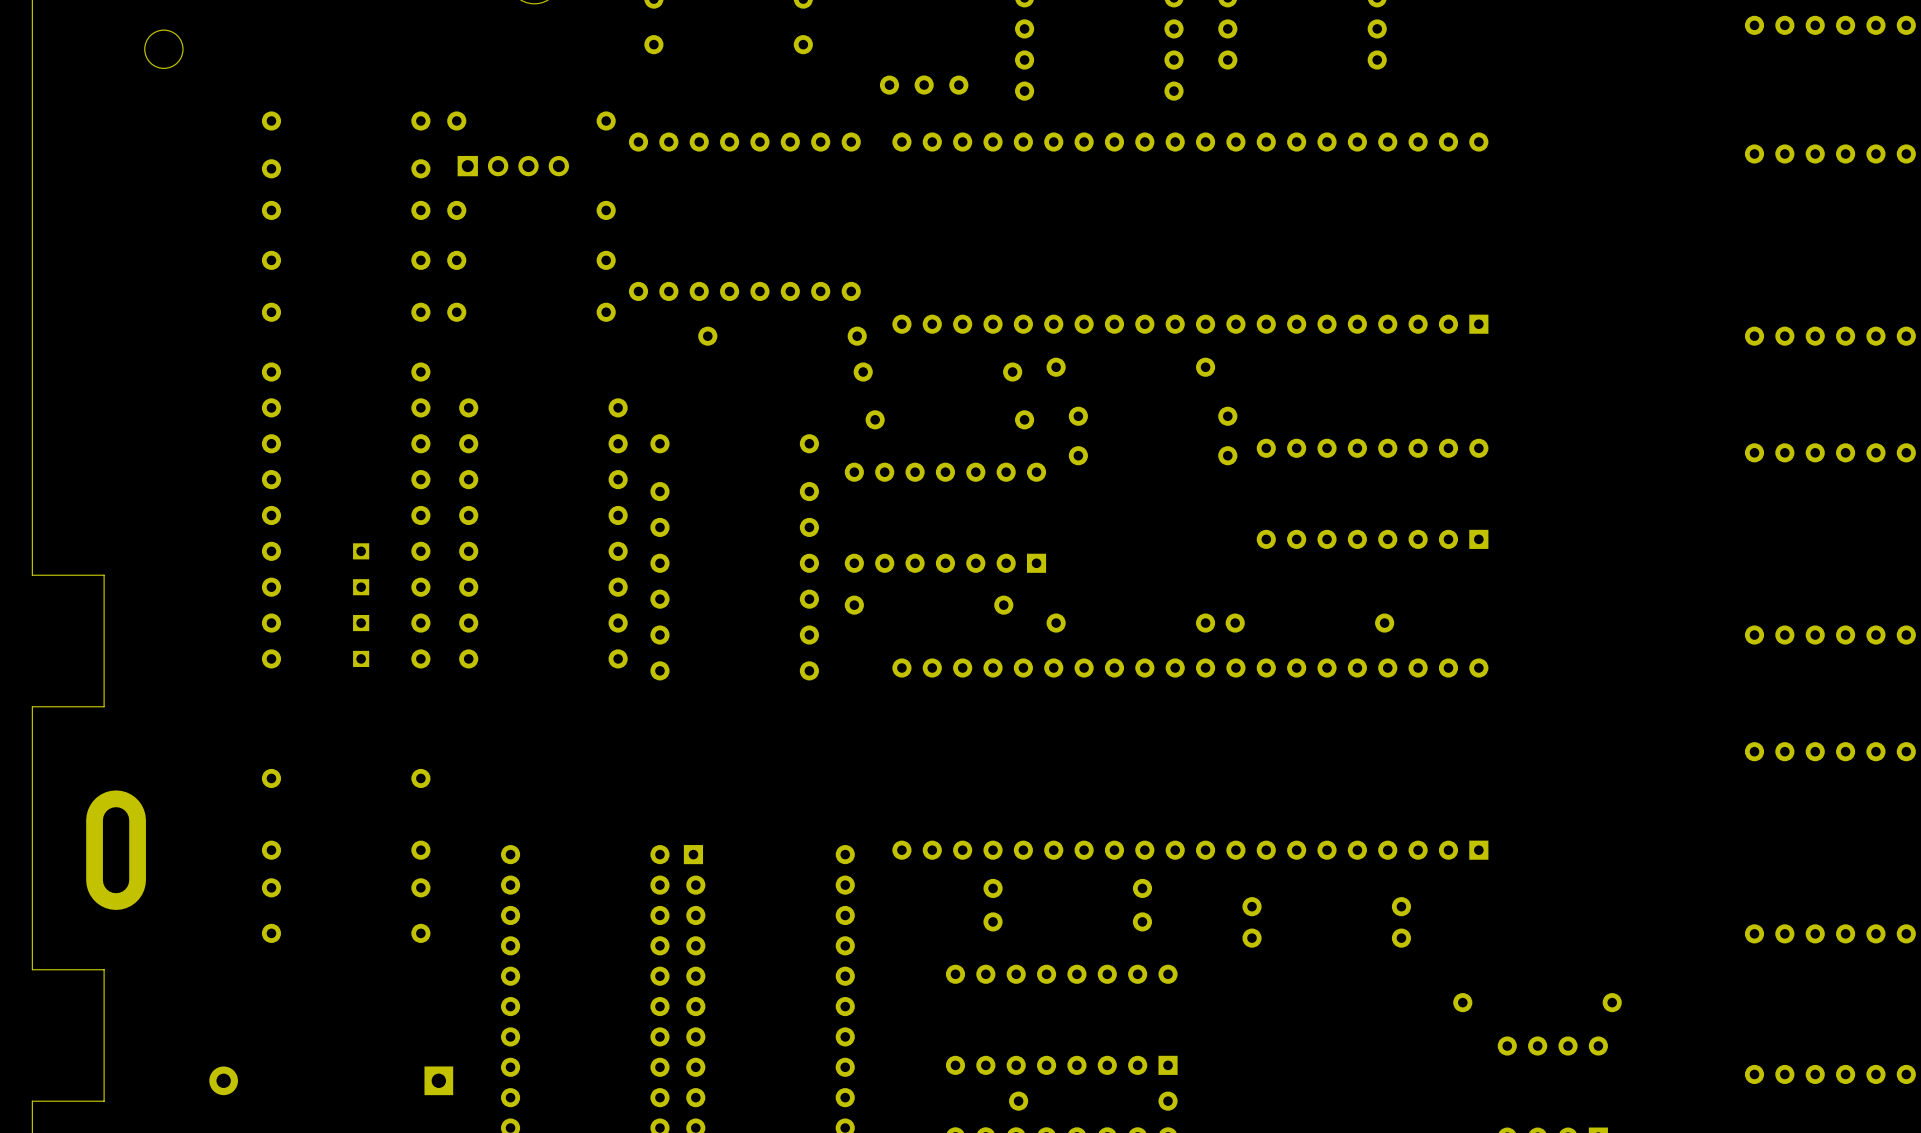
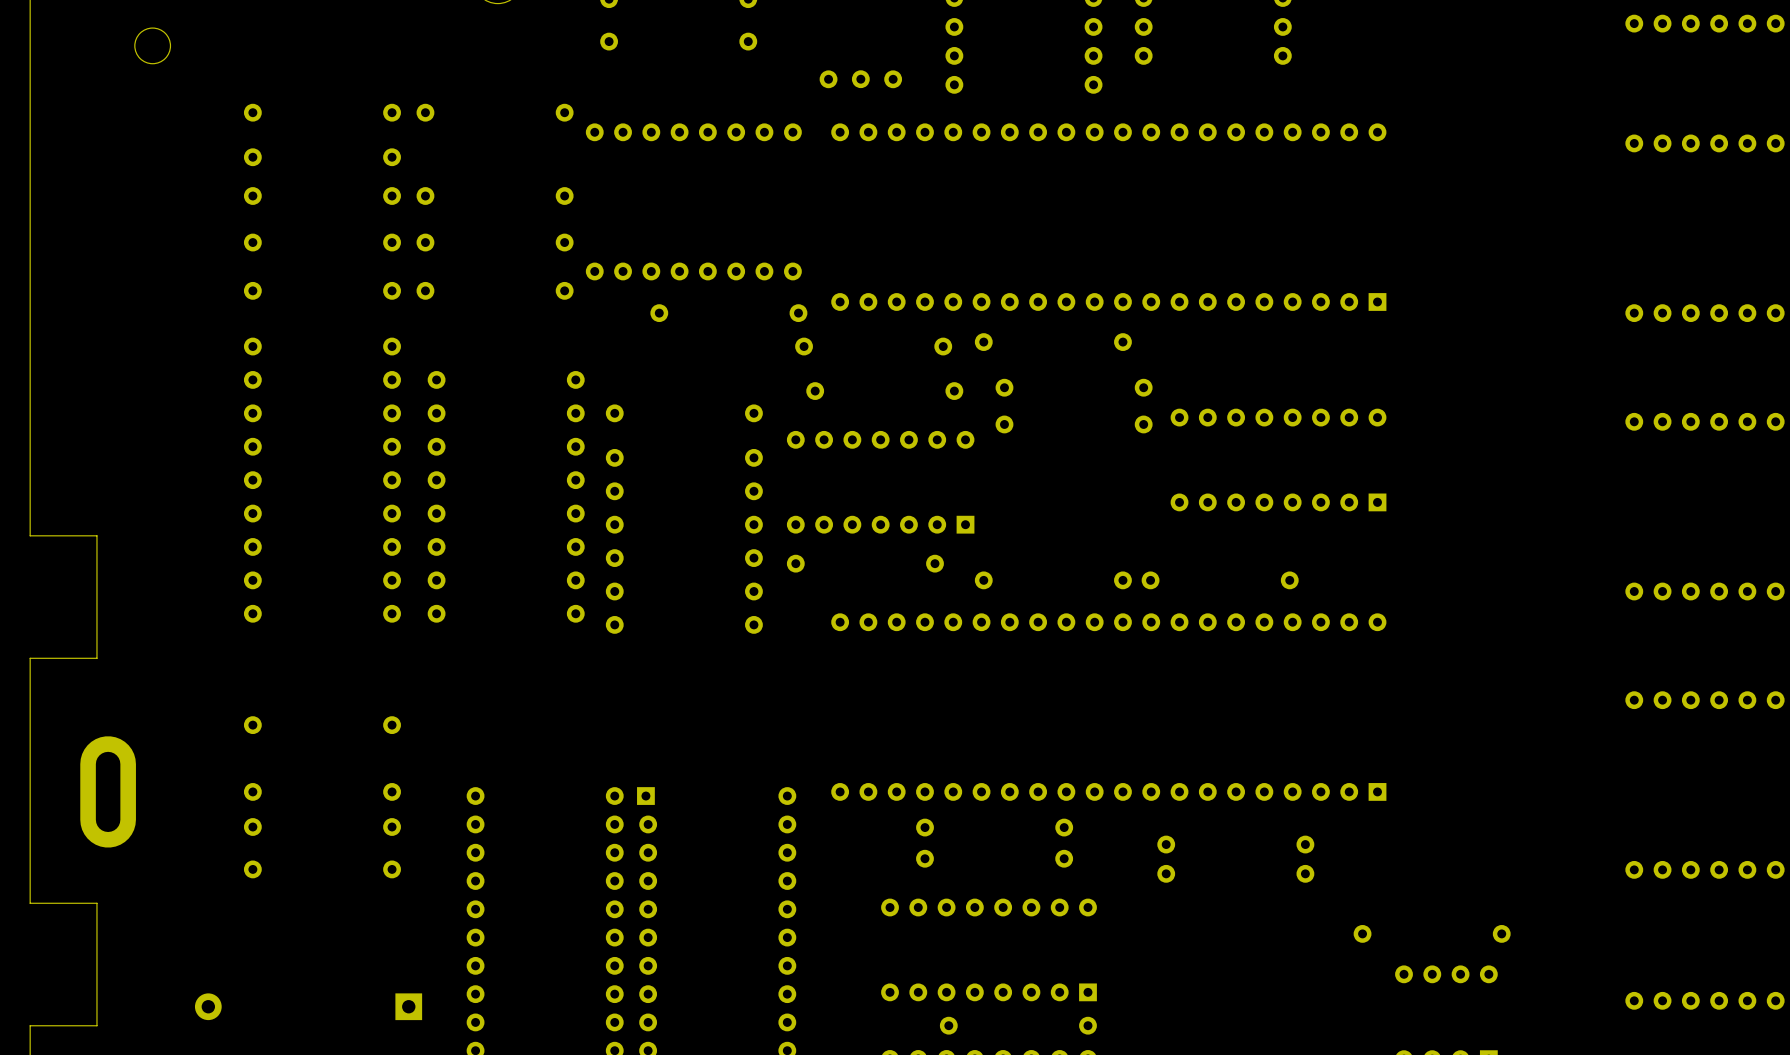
part: (513, 166) -> none
part: (361, 551) -> none
part: (361, 587) -> none
part: (361, 623) -> none
part: (361, 658) -> none

